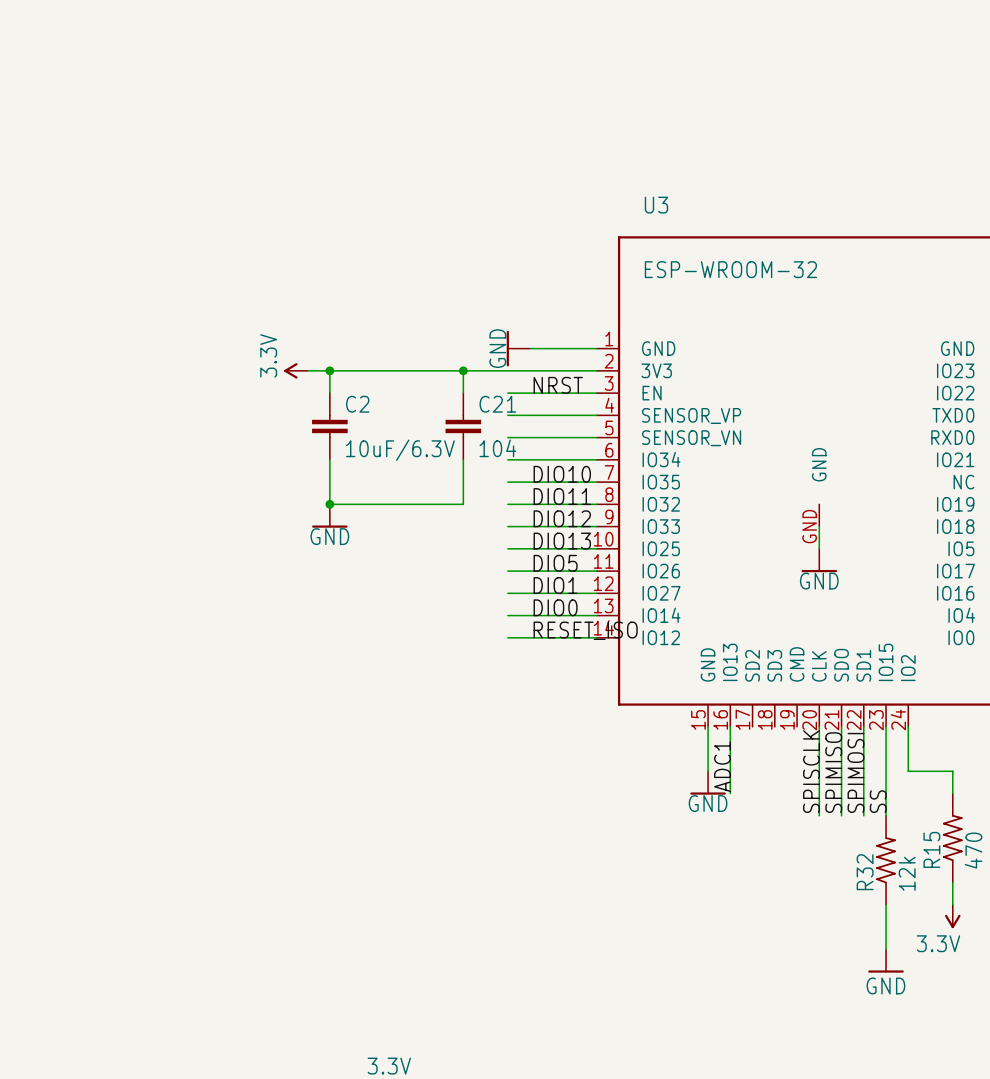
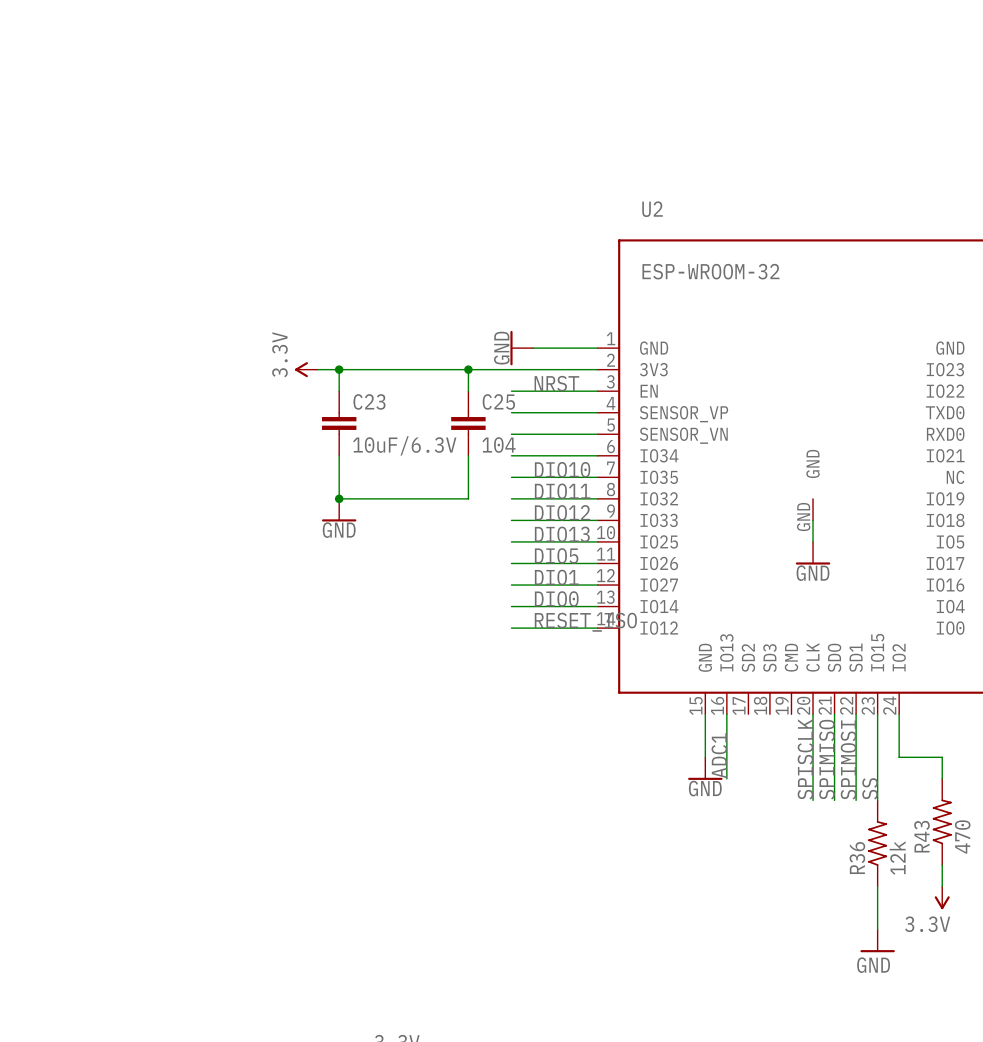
U3 name: U3 (656, 205) -> U2 (652, 209)
C2 name: C2 (357, 404) -> C23 (369, 401)
C21 name: C21 (497, 404) -> C25 (498, 401)
R15 name: R15 (931, 849) -> R43 (921, 836)
R32 name: R32 (865, 872) -> R36 (857, 858)

